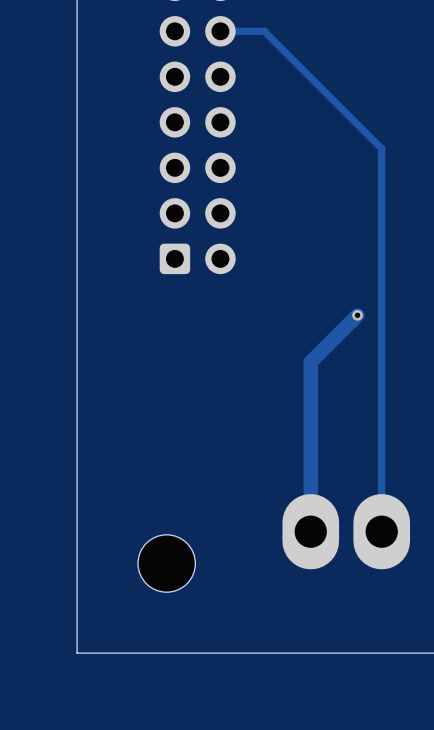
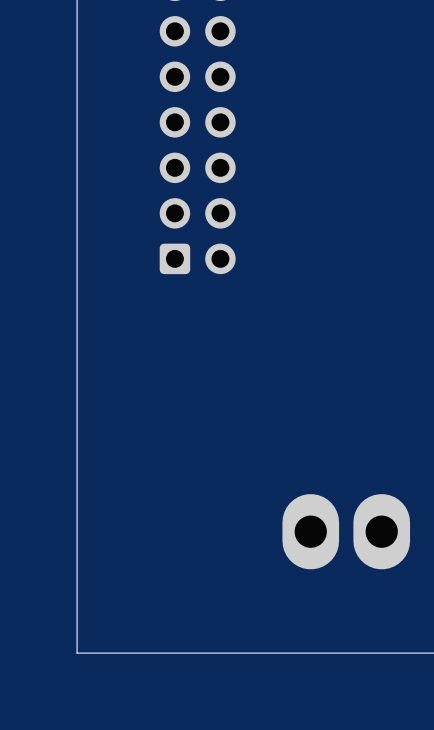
track: (220, 31) (264, 31) (381, 148) (381, 531) -> none
track: (357, 315) (310, 362) (310, 531) -> none
via: (357, 315) -> none
part: (166, 563) -> none

